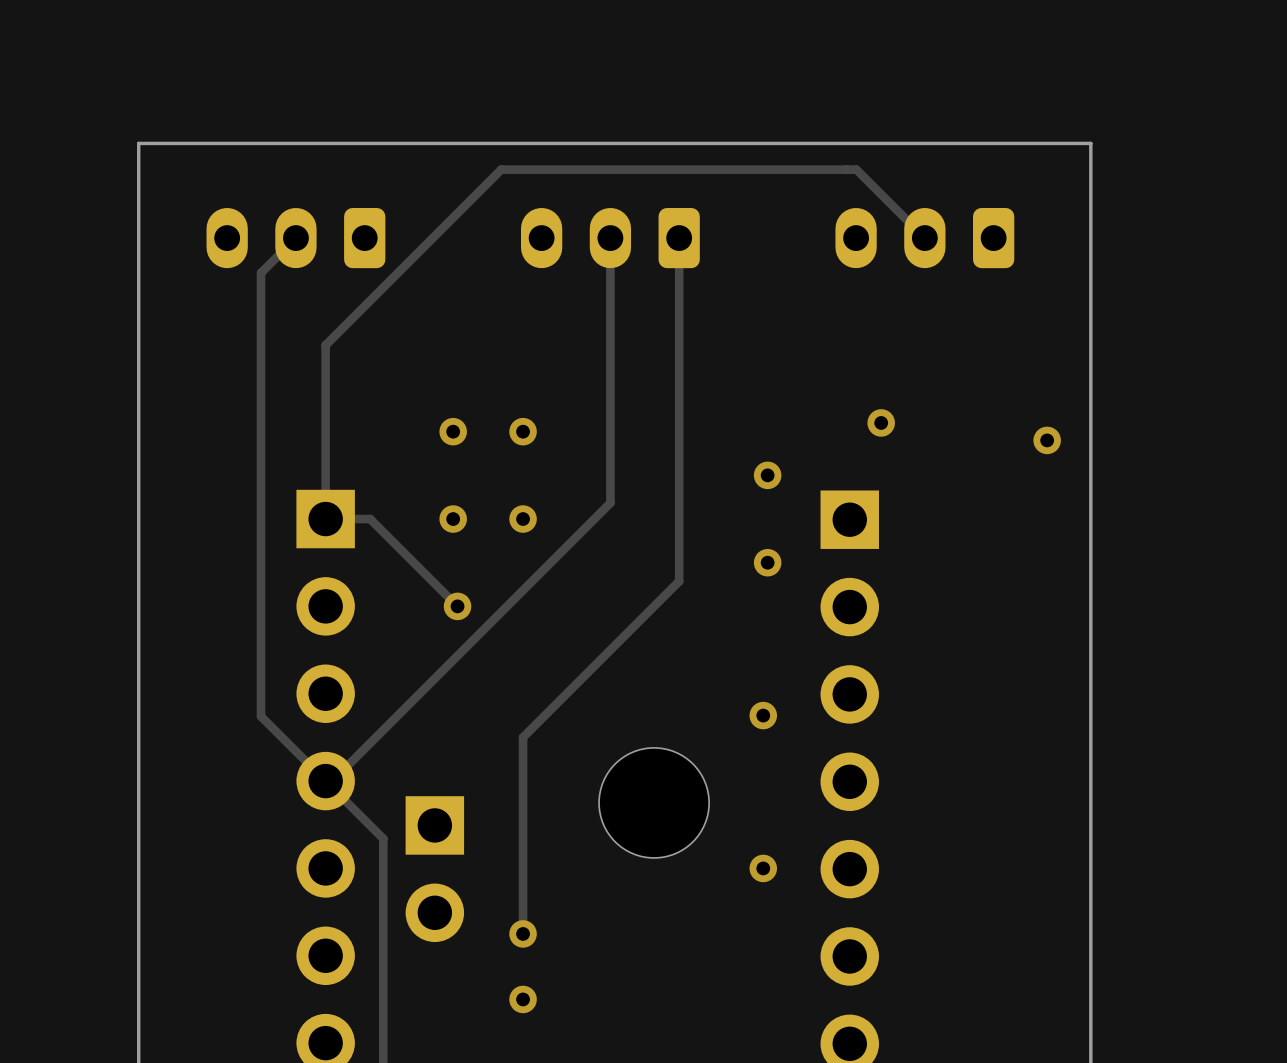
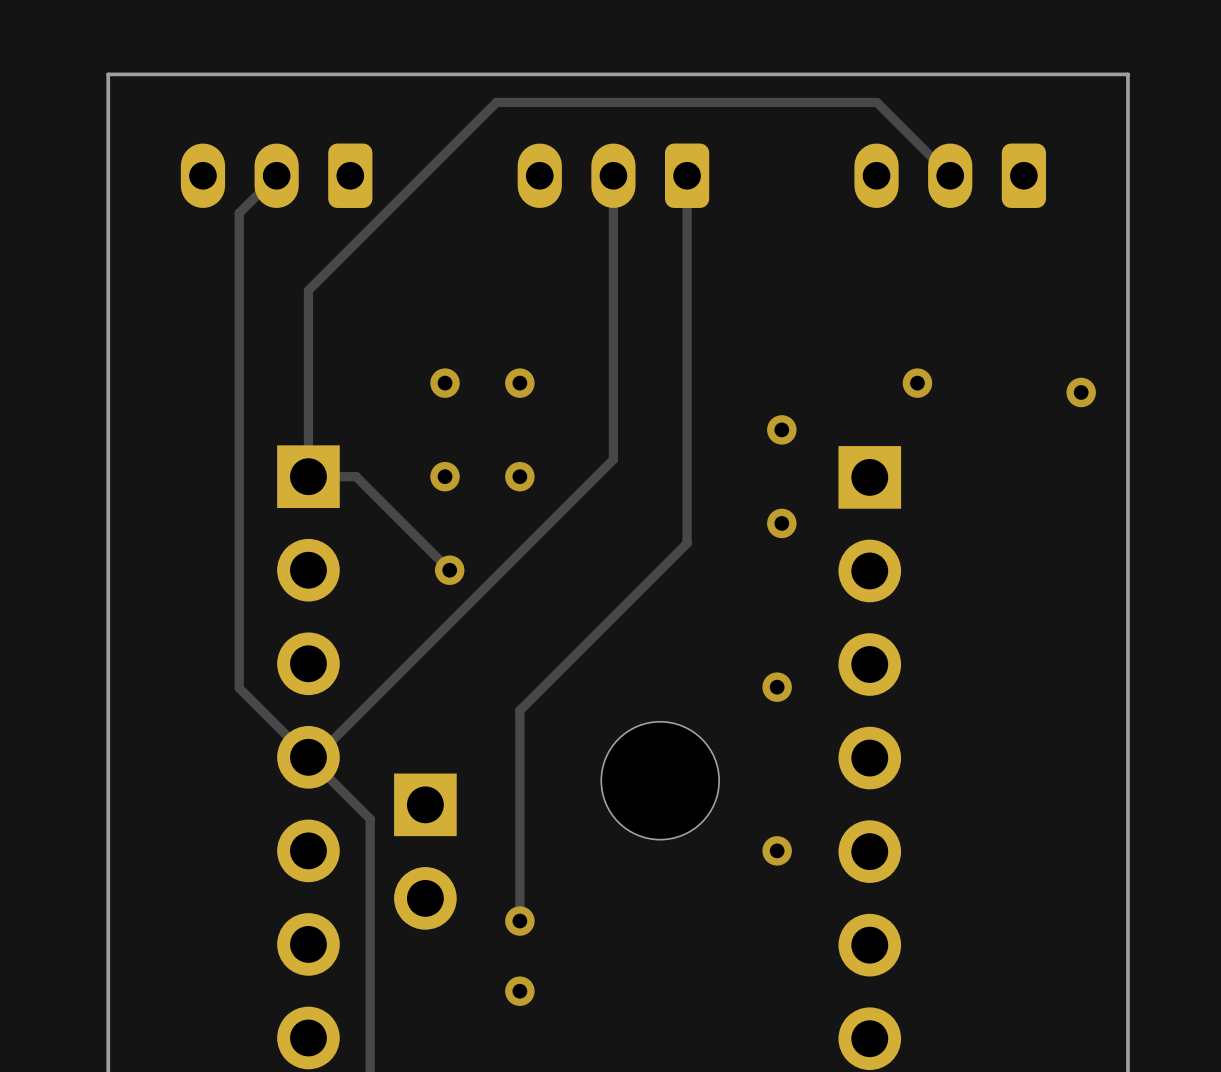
via position: (881, 422) -> (917, 383)

